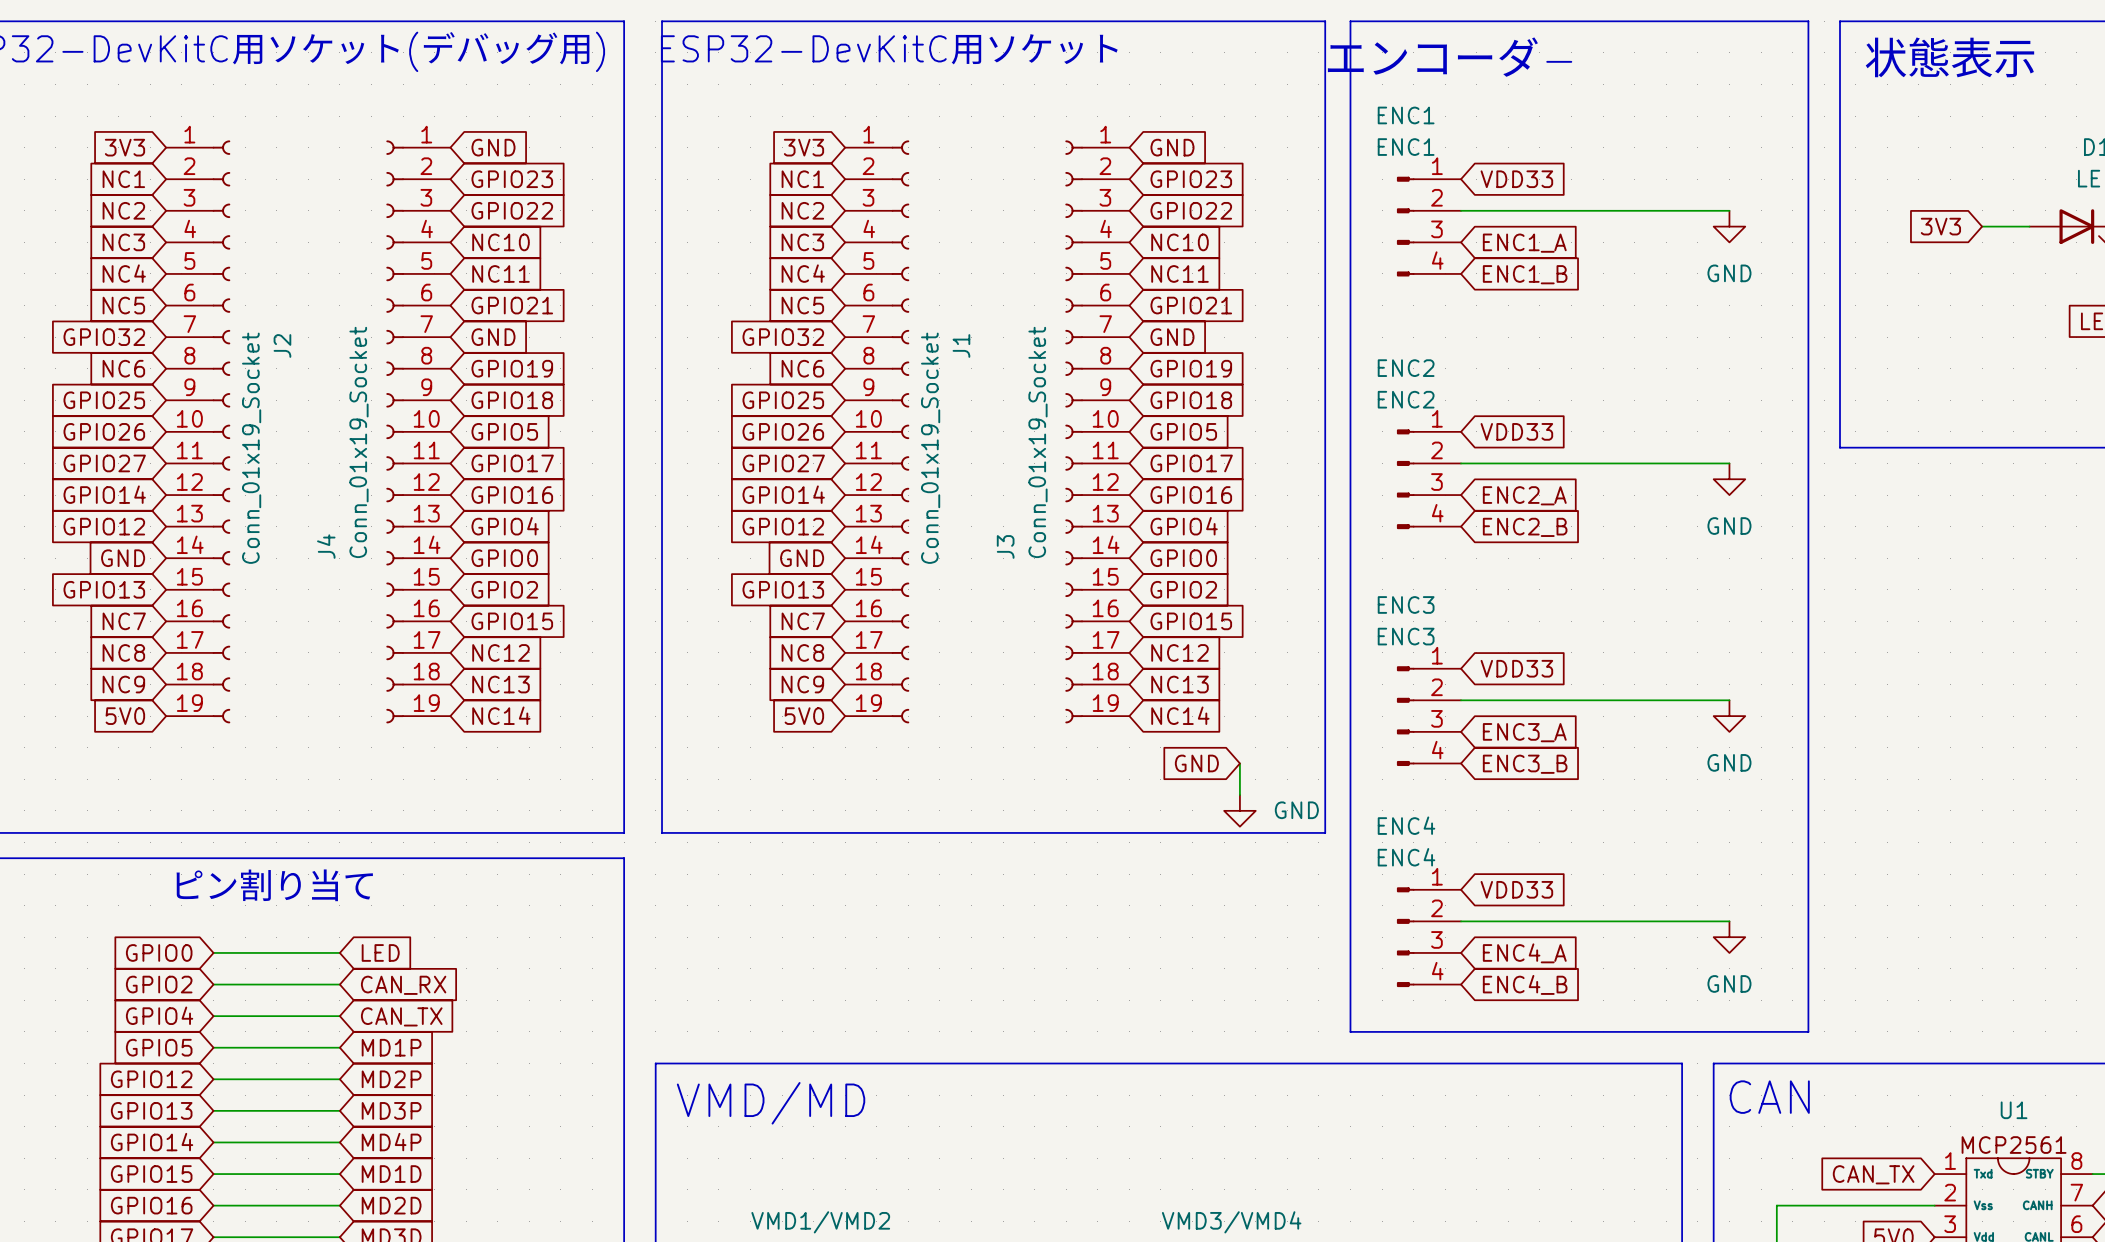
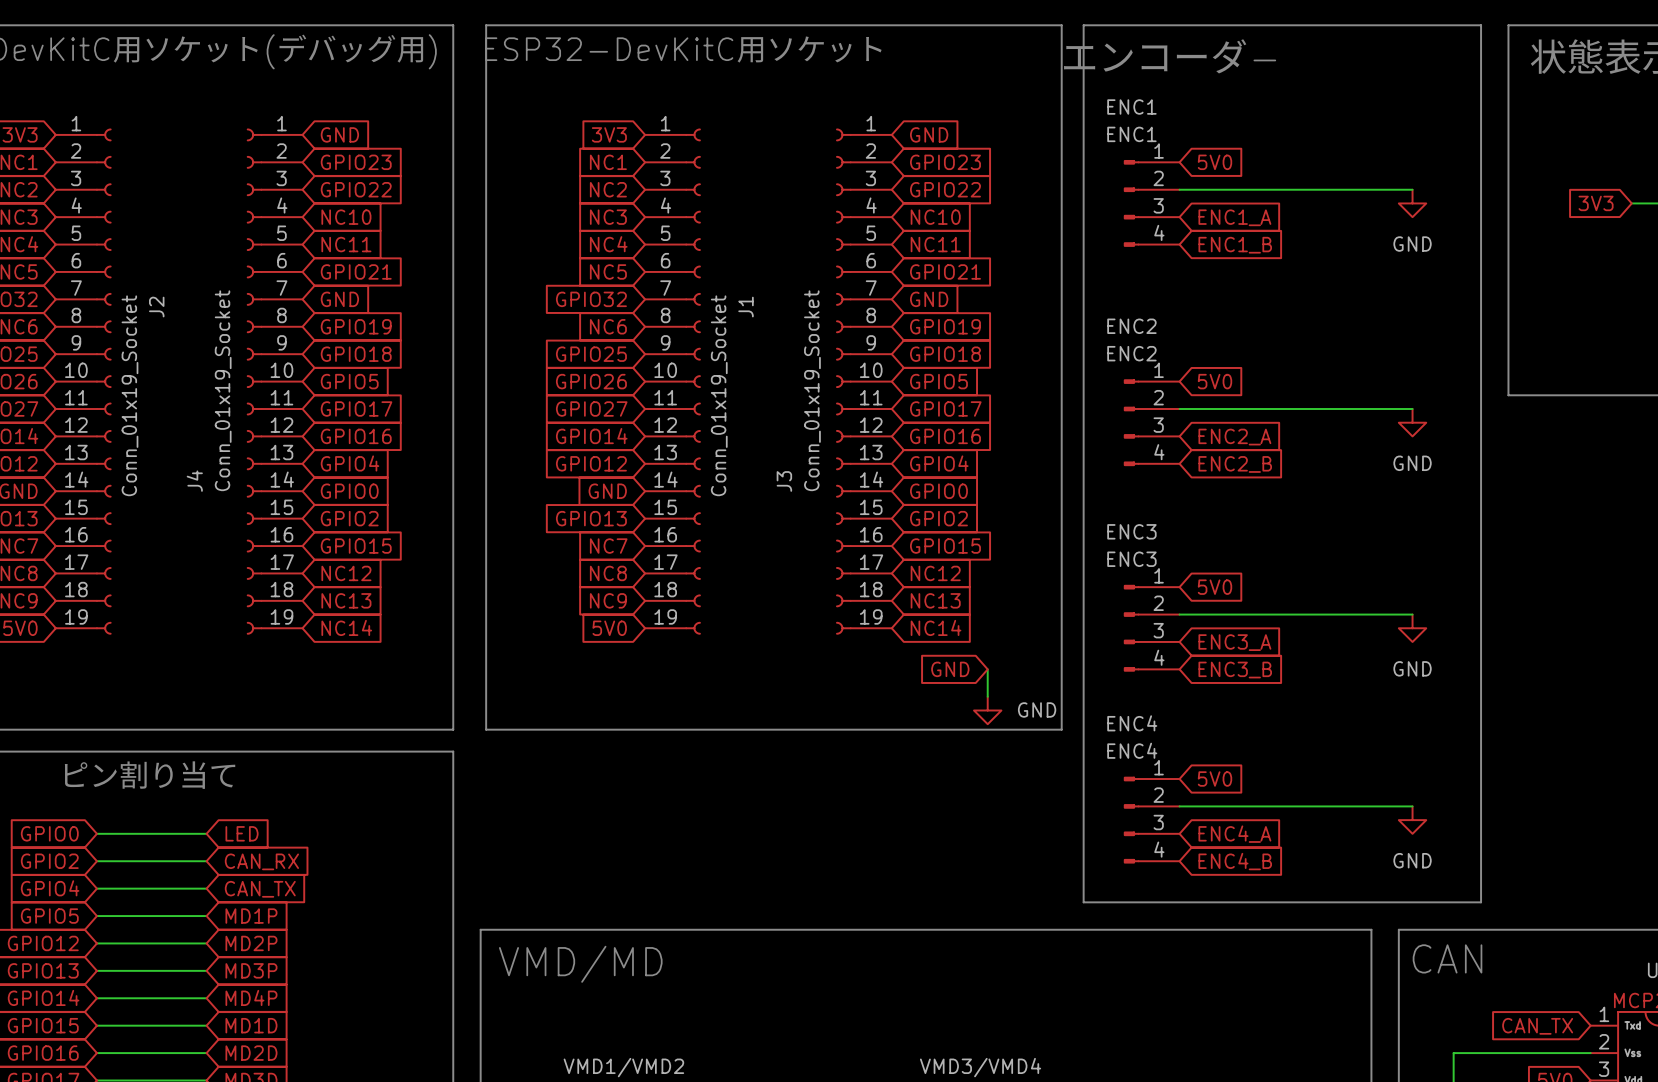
global label: VDD33 (1516, 179) -> 5V0 (1214, 162)
global label: VDD33 (1516, 431) -> 5V0 (1214, 381)
global label: VDD33 (1516, 668) -> 5V0 (1214, 587)
global label: VDD33 (1516, 889) -> 5V0 (1214, 779)

